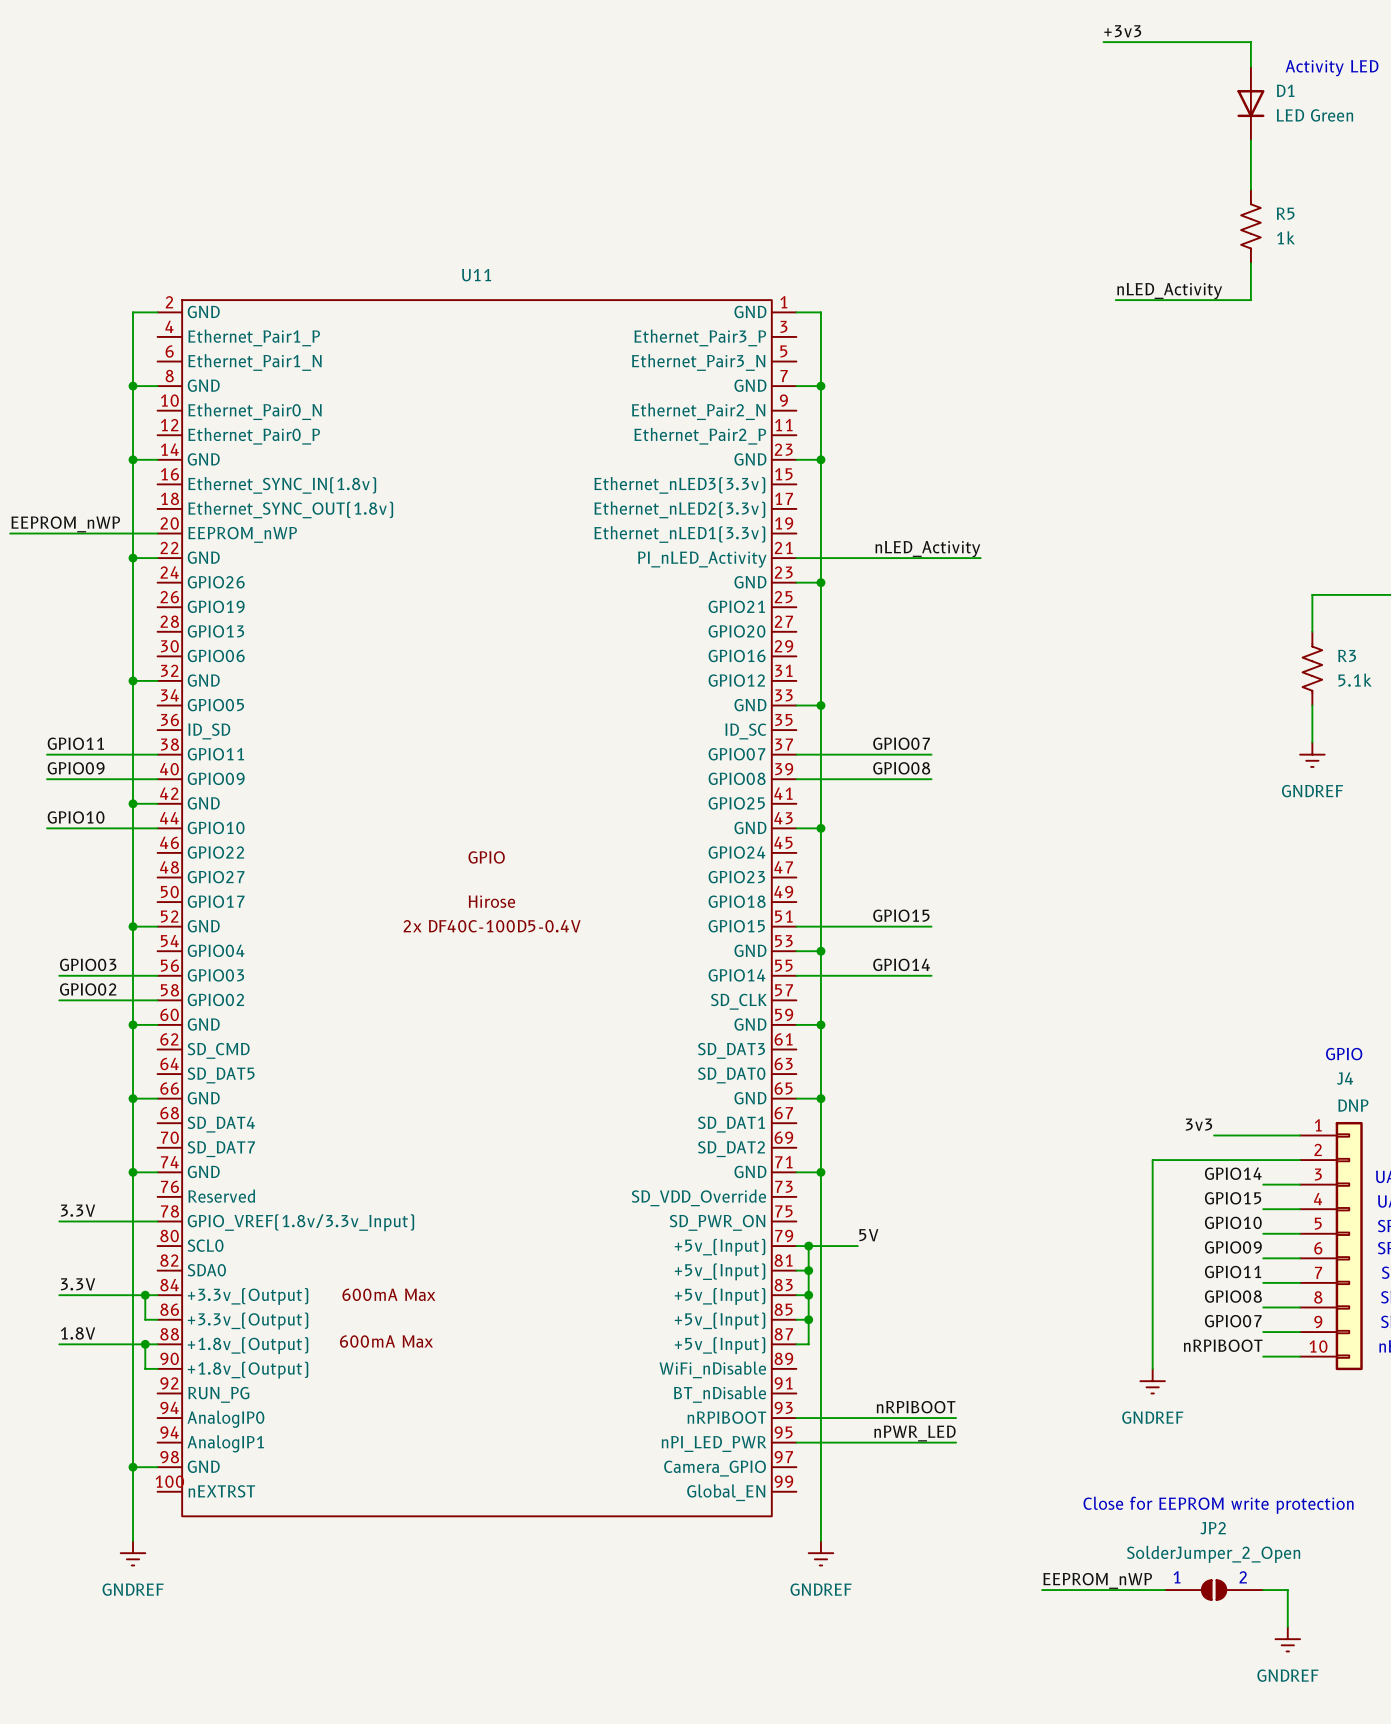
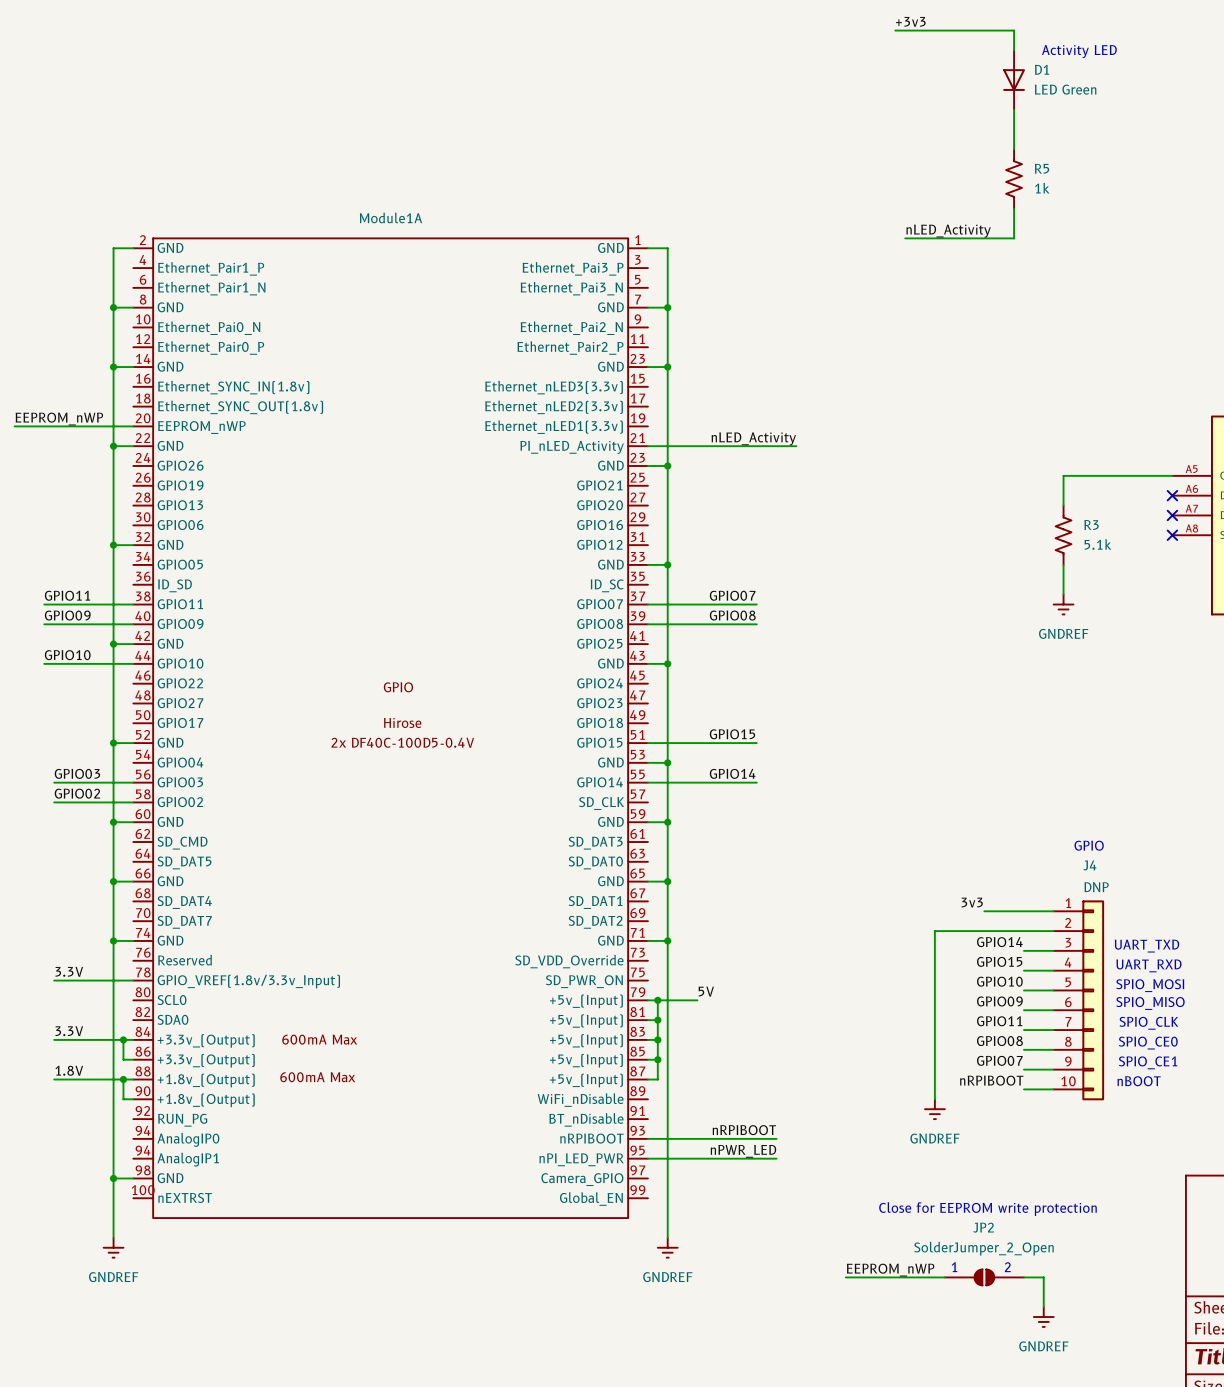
U11 name: U11 (476, 275) -> Module1A (390, 217)
U11 pin name: Ethernet_Pair3_P (700, 337) -> Ethernet_Pai3_P (573, 268)
U11 pin name: Ethernet_Pair3_N (698, 362) -> Ethernet_Pai3_N (571, 288)
U11 pin name: Ethernet_Pair0_N (254, 411) -> Ethernet_Pai0_N (209, 328)
U11 pin name: Ethernet_Pair2_N (698, 411) -> Ethernet_Pai2_N (571, 328)

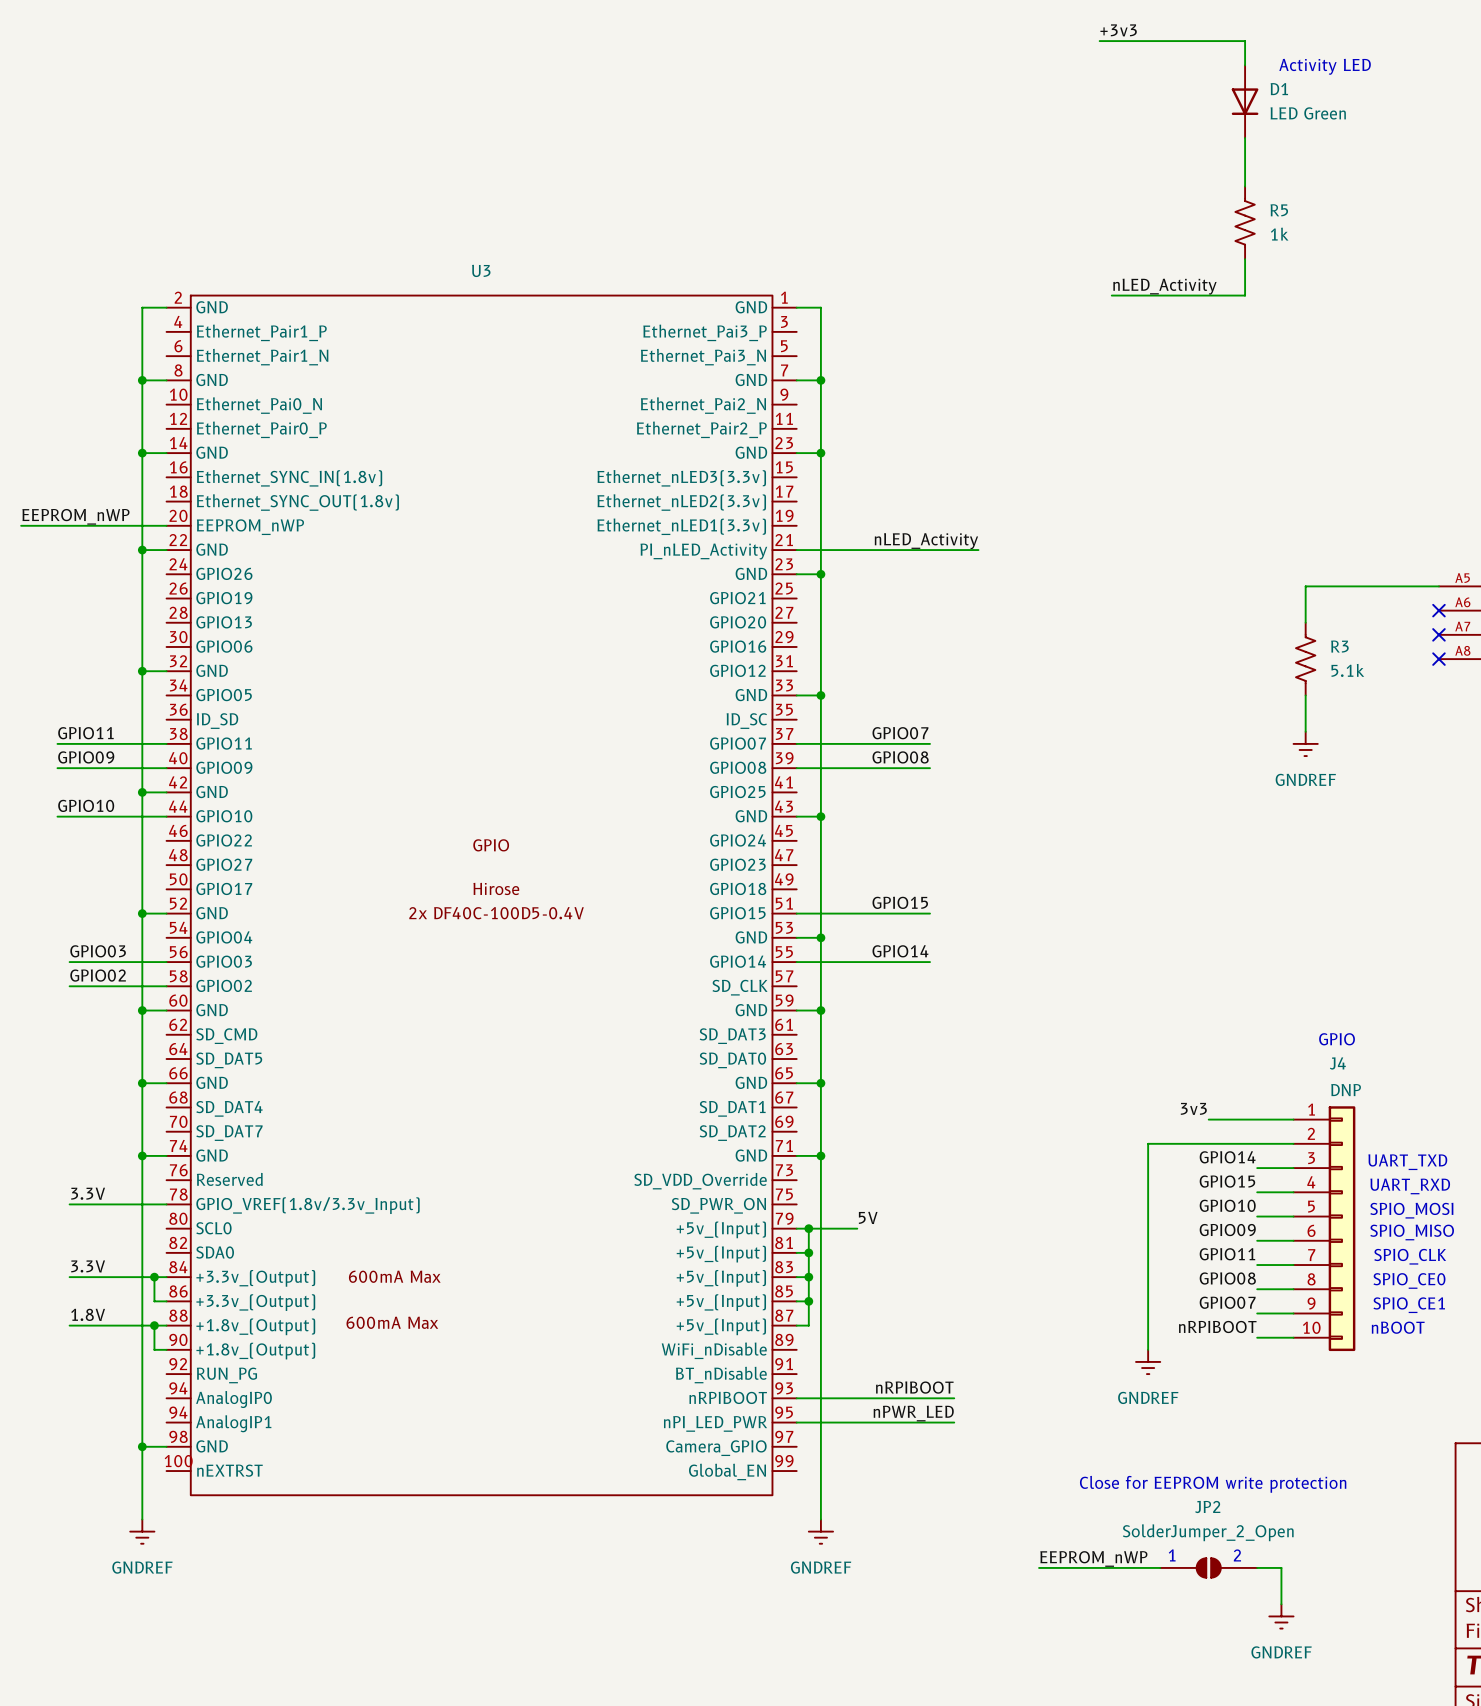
Module1A name: Module1A (390, 217) -> U3 (481, 270)

